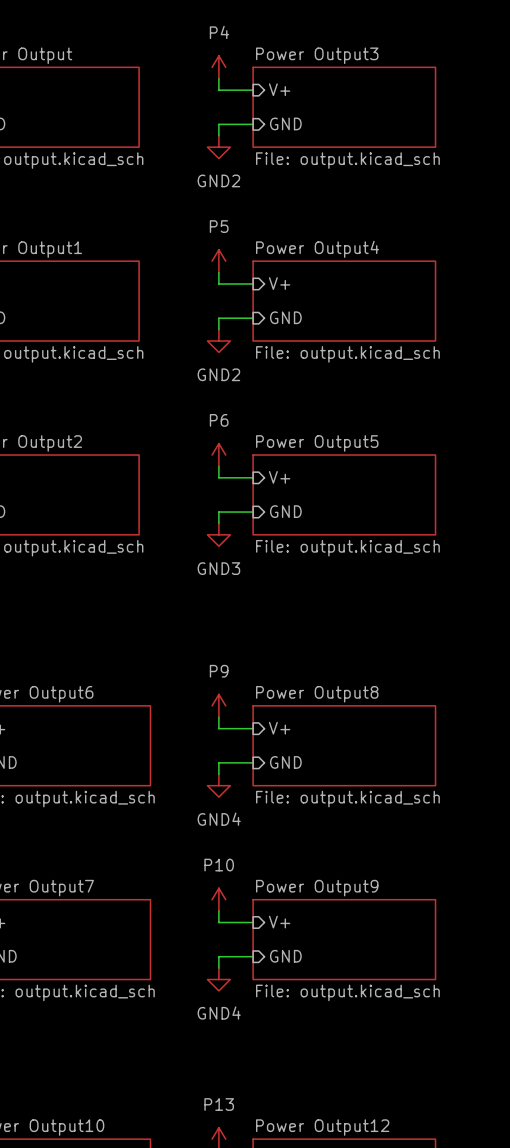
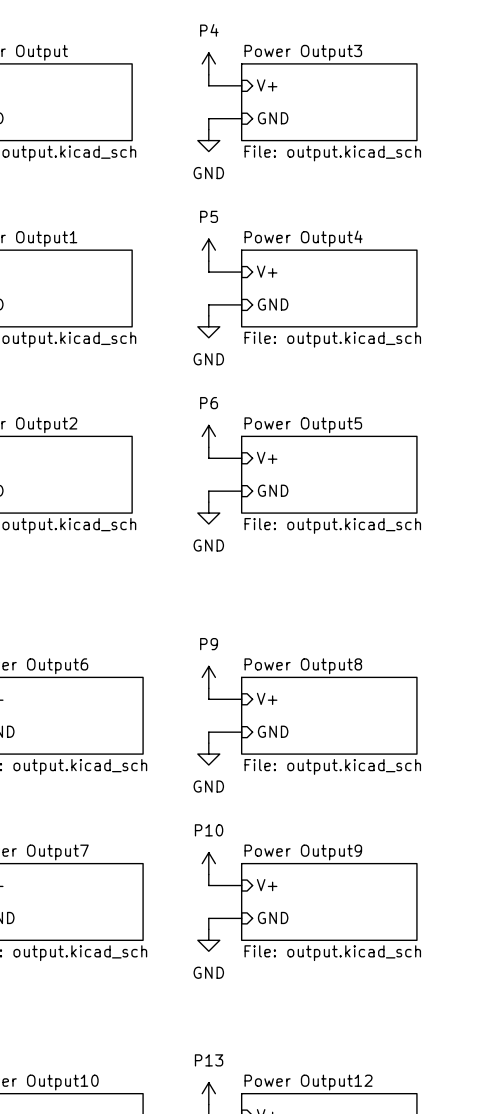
power symbol: GND2 (218, 147) -> GND (208, 140)
power symbol: GND2 (218, 341) -> GND (208, 326)
power symbol: GND3 (218, 534) -> GND (208, 513)
power symbol: GND4 (218, 785) -> GND (208, 754)
power symbol: GND4 (218, 979) -> GND (208, 940)

